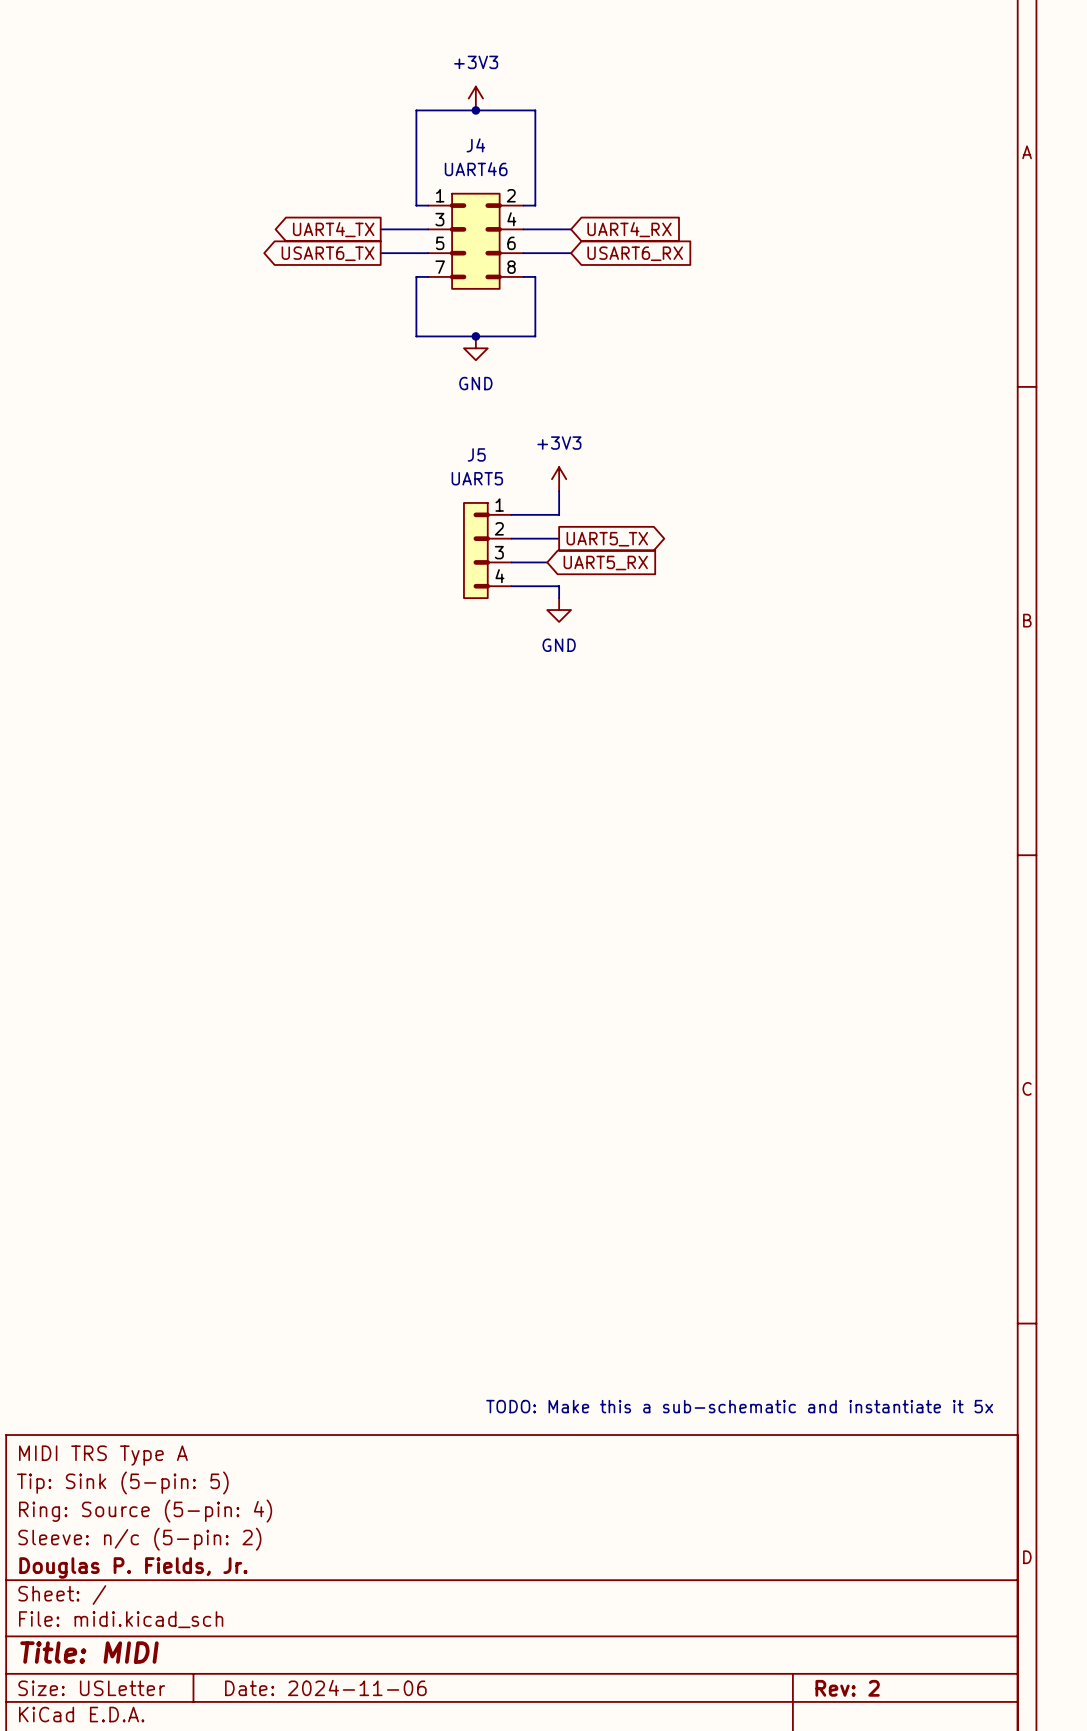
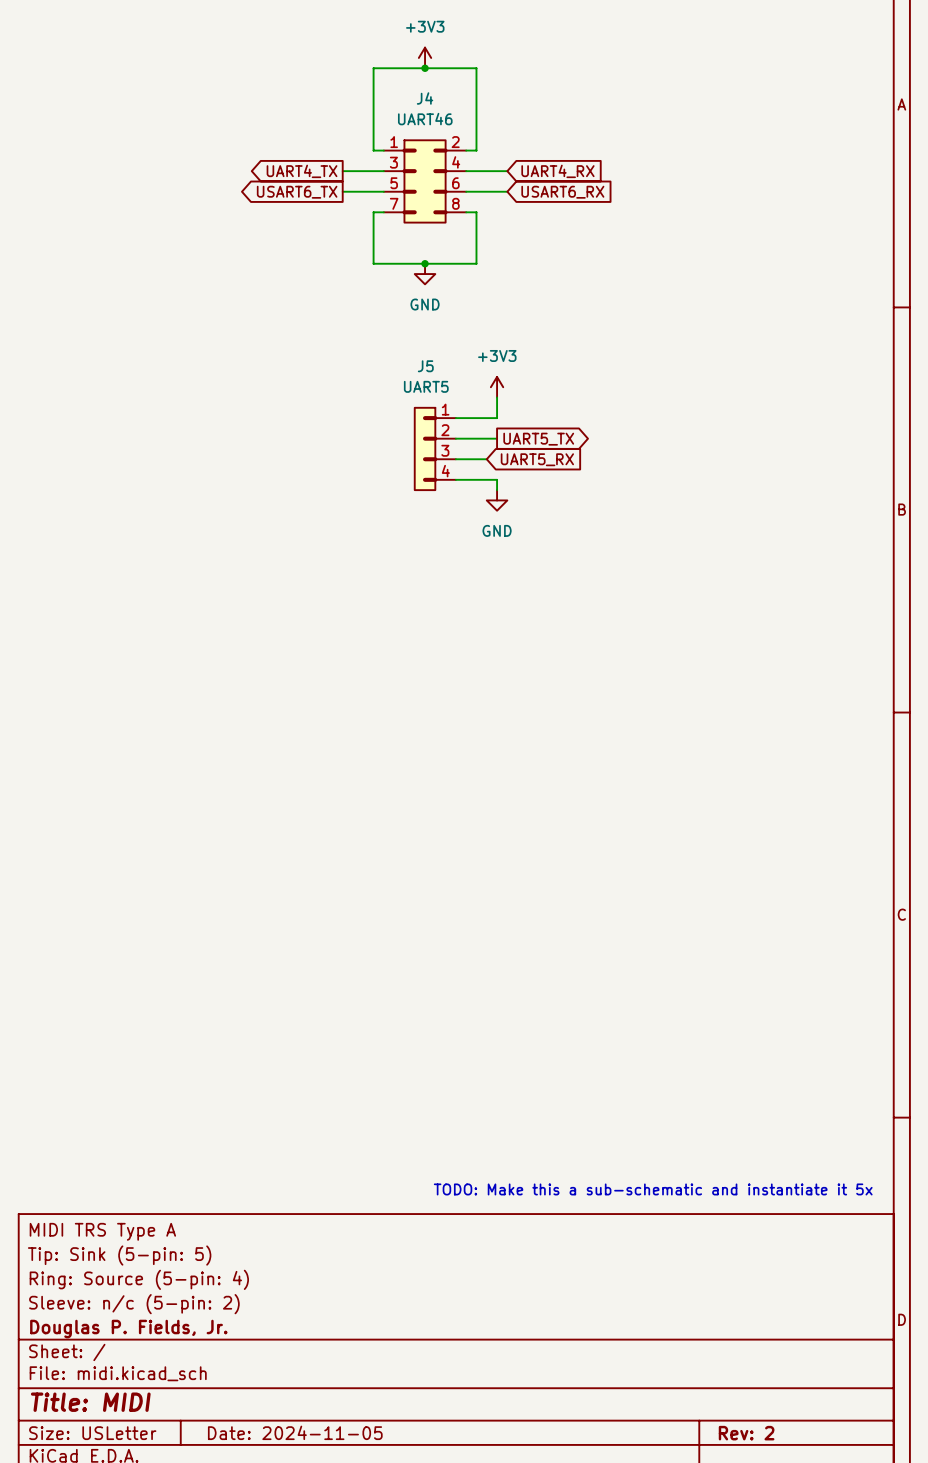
title block: Date: 2024-11-06 (325, 1687) -> Date: 2024-11-05 (295, 1432)

